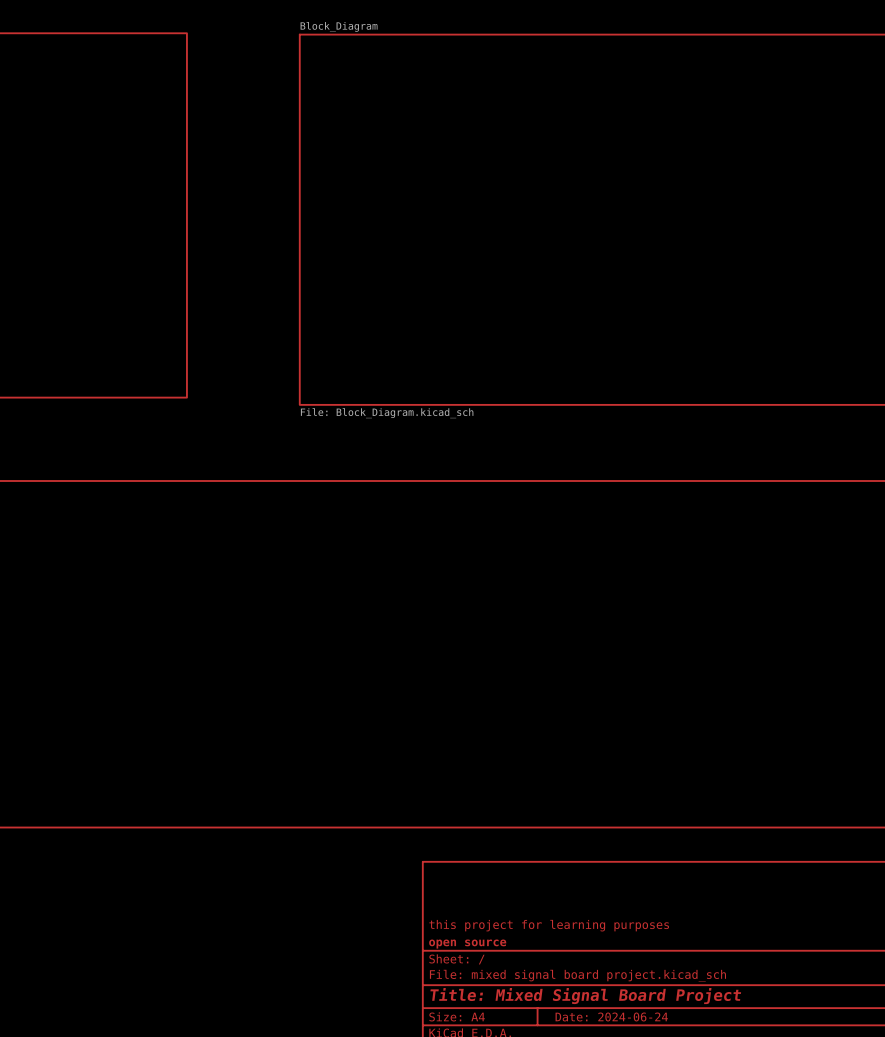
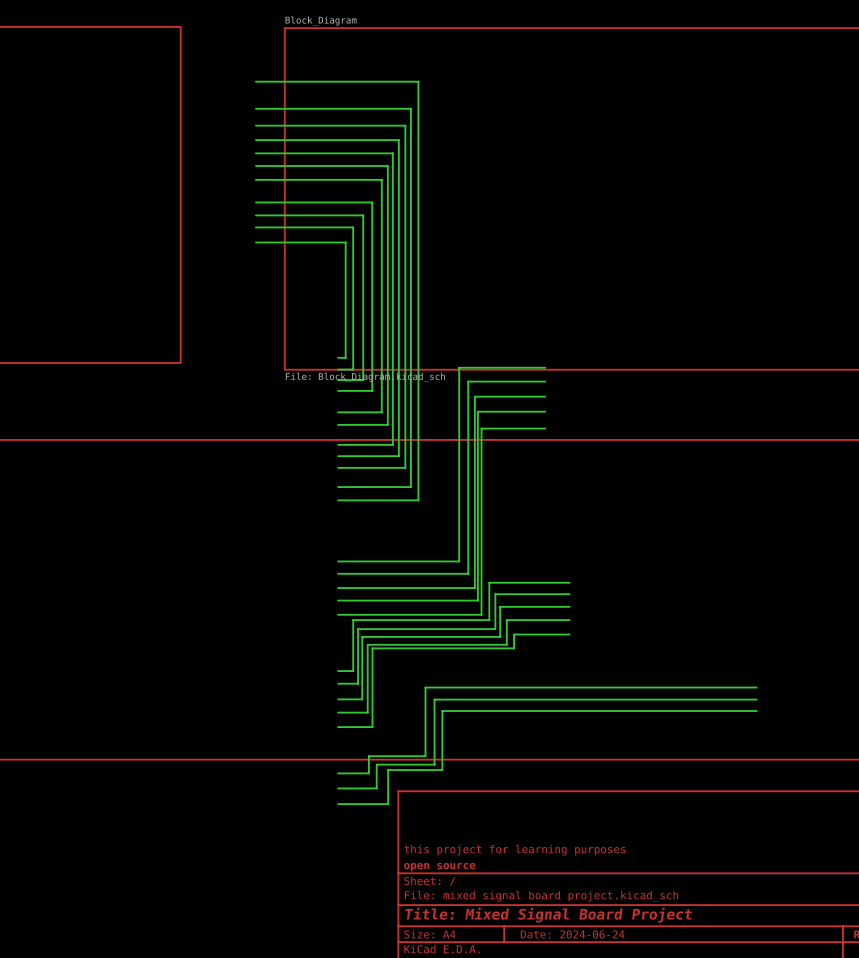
wire: none -> (255, 81) (418, 81) (418, 500) (338, 500)
wire: none -> (255, 108) (410, 108) (410, 487) (338, 487)
wire: none -> (255, 125) (405, 125) (405, 467) (338, 467)
wire: none -> (255, 140) (398, 140) (398, 456) (338, 456)
wire: none -> (255, 153) (392, 153) (392, 444) (338, 444)
wire: none -> (255, 166) (387, 166) (387, 424) (338, 424)
wire: none -> (255, 179) (381, 179) (381, 412) (338, 412)
wire: none -> (255, 202) (372, 202) (372, 390) (338, 390)
wire: none -> (255, 215) (363, 215) (363, 380) (338, 380)
wire: none -> (255, 227) (353, 227) (353, 369) (338, 369)
wire: none -> (255, 242) (345, 242) (345, 357) (338, 357)
wire: none -> (545, 367) (459, 367) (459, 561) (338, 561)
wire: none -> (545, 381) (468, 381) (468, 573) (338, 573)
wire: none -> (545, 396) (474, 396) (474, 588) (338, 588)
wire: none -> (545, 411) (477, 411) (477, 600) (338, 600)
wire: none -> (545, 428) (481, 428) (481, 614) (338, 614)
wire: none -> (569, 582) (489, 582) (489, 620) (353, 620) (353, 671) (338, 671)
wire: none -> (569, 594) (495, 594) (495, 629) (358, 629) (358, 683) (338, 683)
wire: none -> (569, 606) (500, 606) (500, 636) (362, 636) (362, 699) (338, 699)
wire: none -> (569, 620) (506, 620) (506, 644) (367, 644) (367, 712) (338, 712)
wire: none -> (569, 634) (514, 634) (514, 648) (372, 648) (372, 727) (338, 727)
wire: none -> (756, 687) (425, 687) (425, 756) (368, 756) (368, 773) (338, 773)
wire: none -> (756, 699) (434, 699) (434, 764) (376, 764) (376, 788) (338, 788)
wire: none -> (756, 711) (442, 711) (442, 770) (388, 770) (388, 804) (338, 804)

